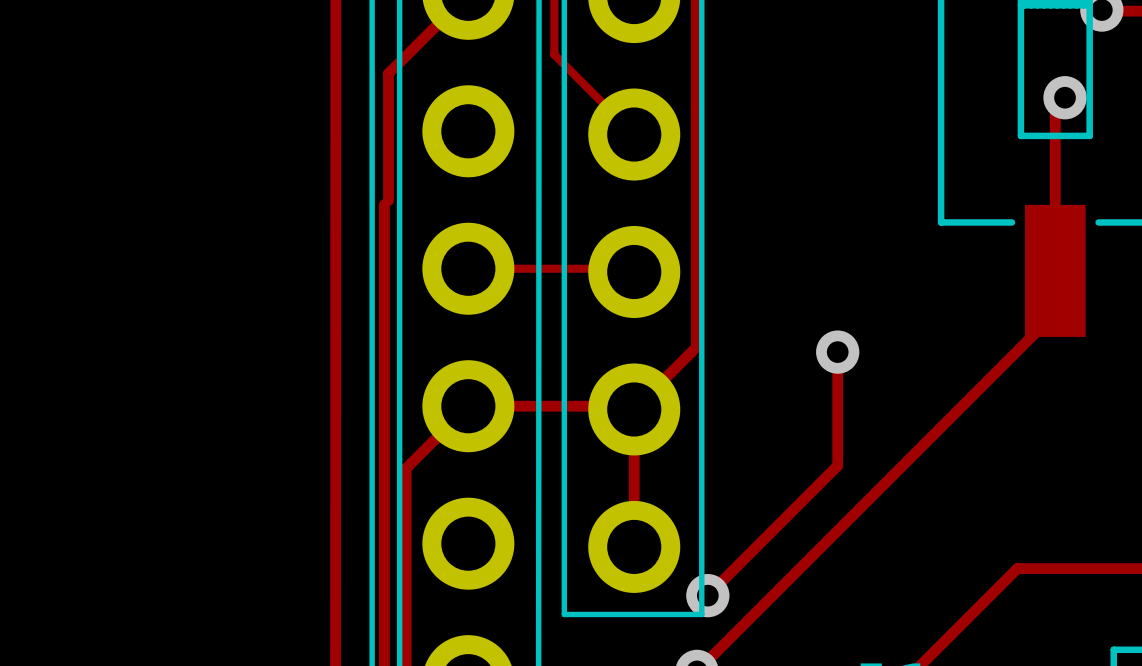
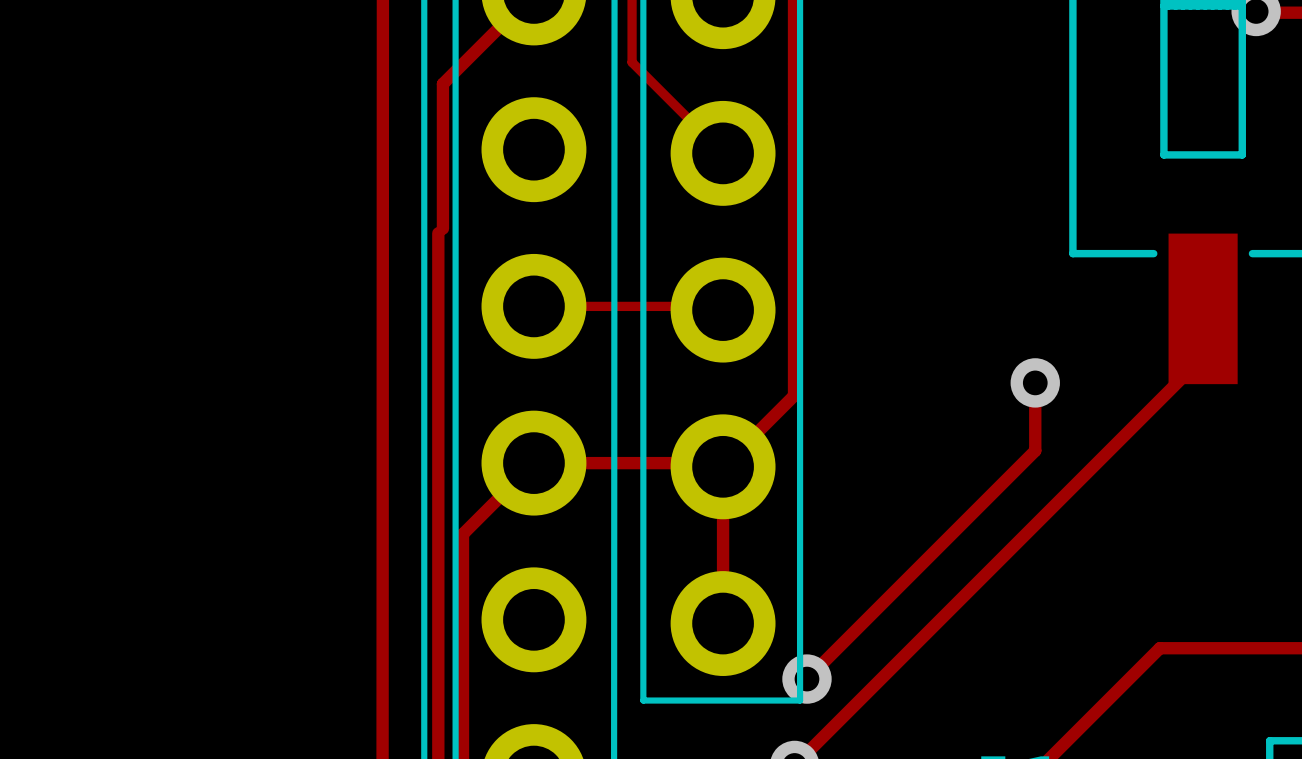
track: (1065, 97) (1055, 107) (1055, 270) -> none
via: (1065, 97) -> none
track: (837, 352) (837, 465) -> (1035, 382) (1035, 450) (955, 531)
via position: (837, 352) -> (1035, 382)

